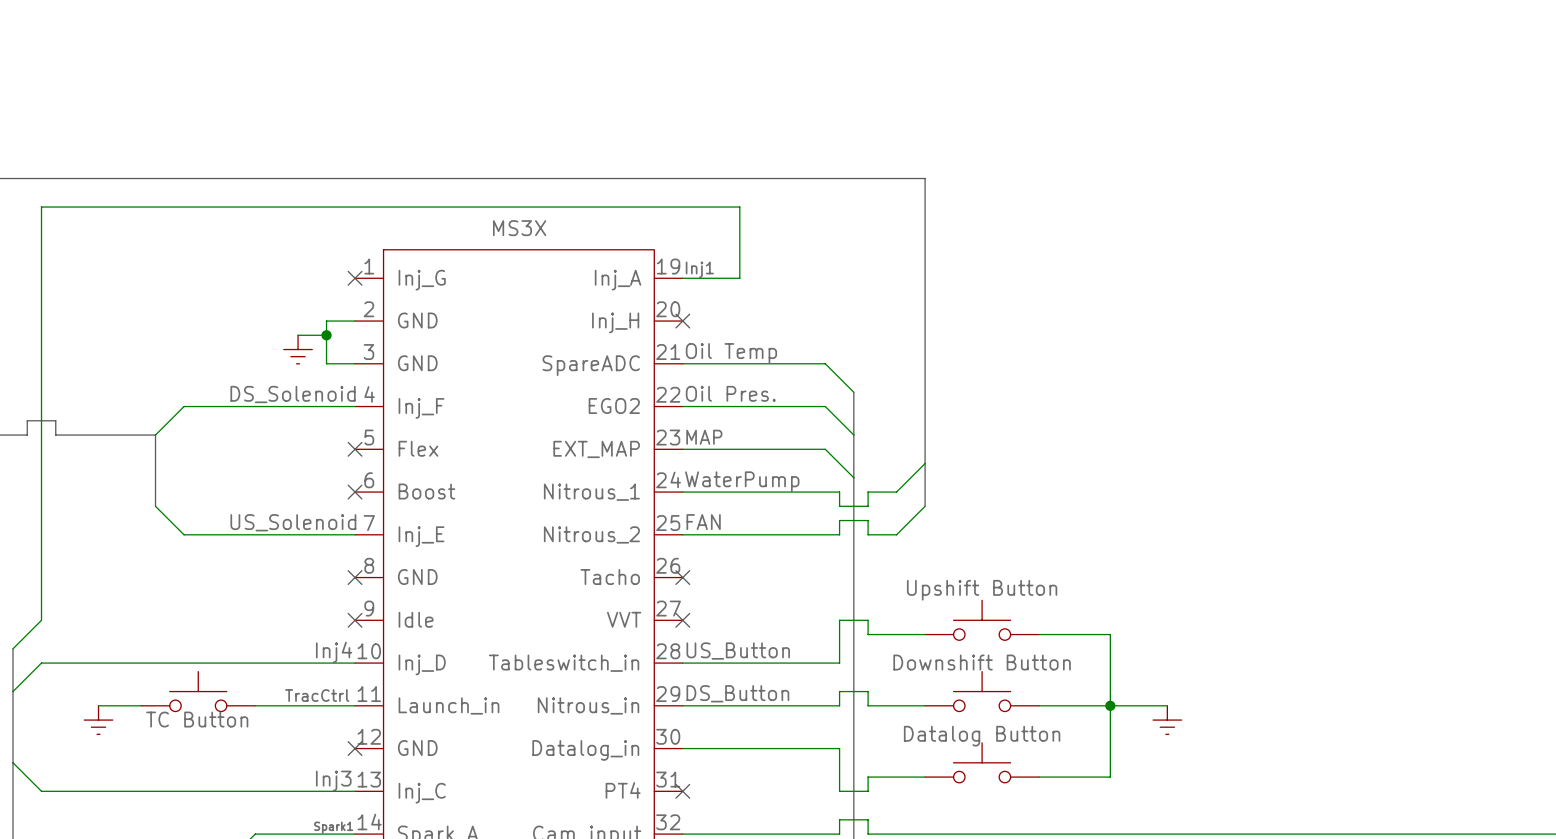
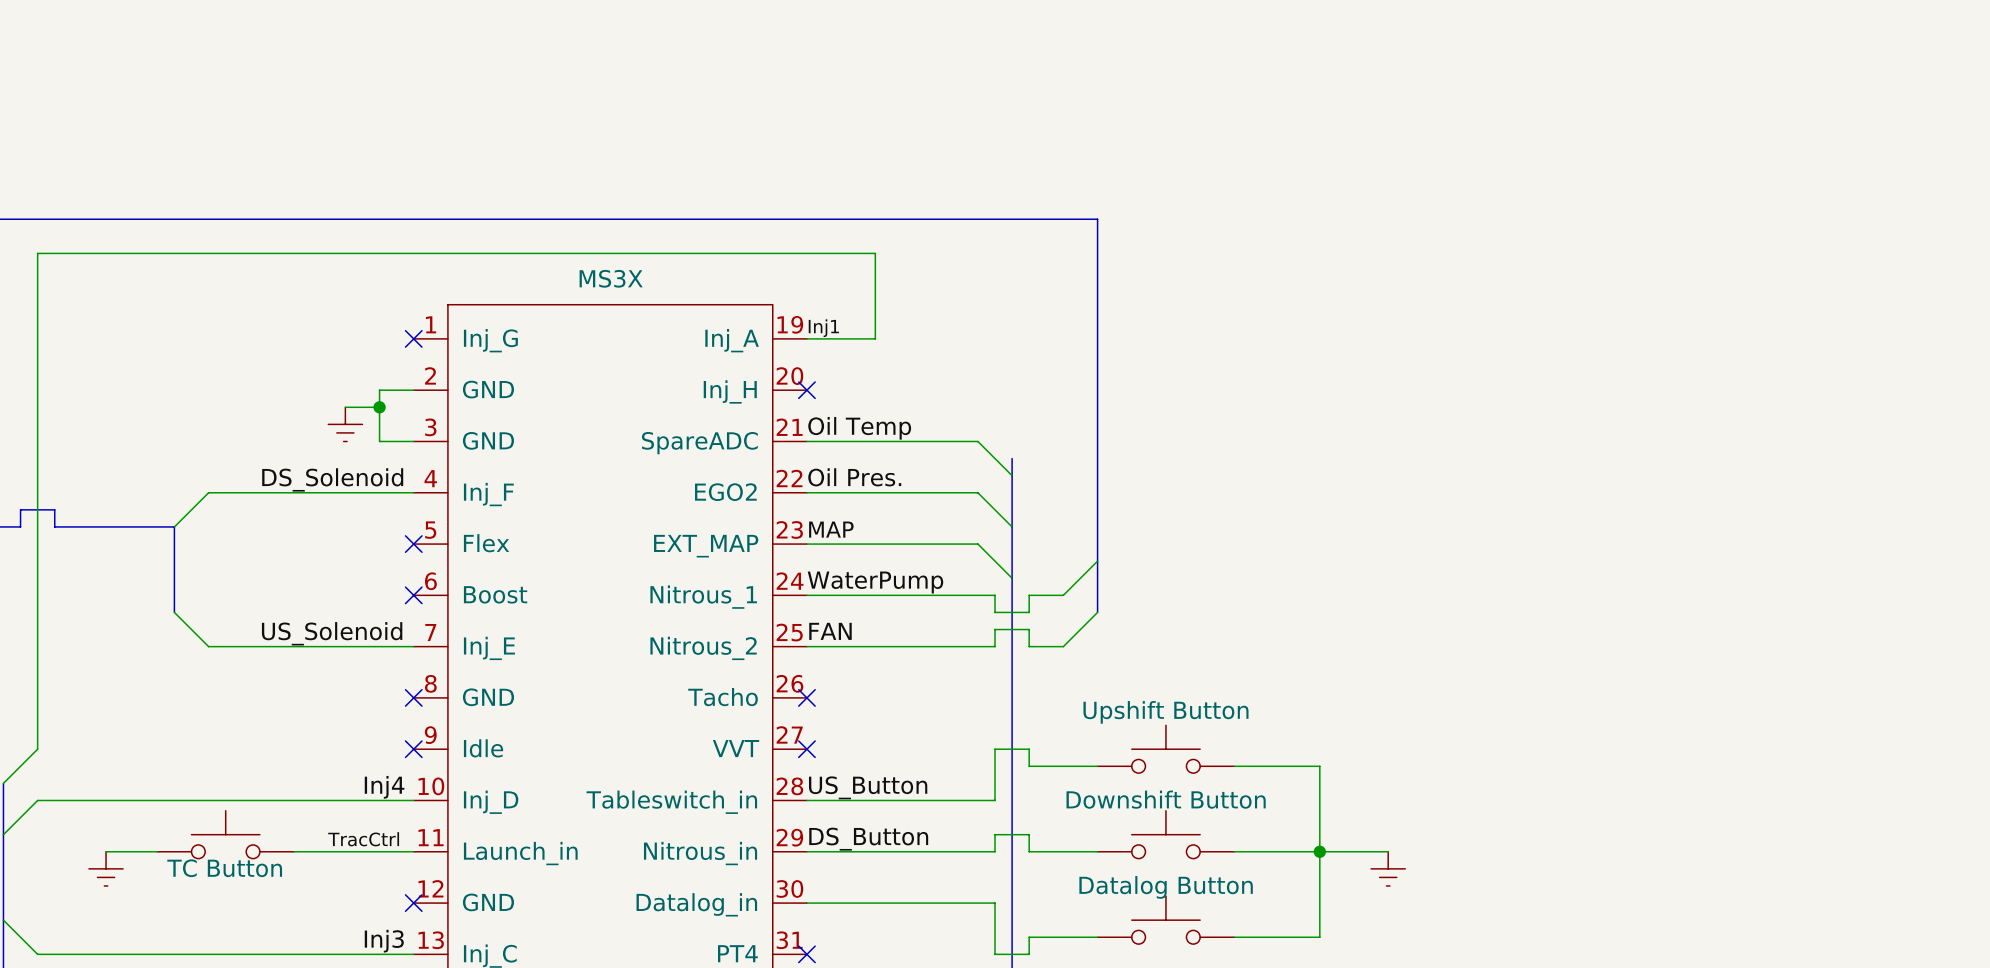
bus: none -> (1012, 458) (1012, 475)

